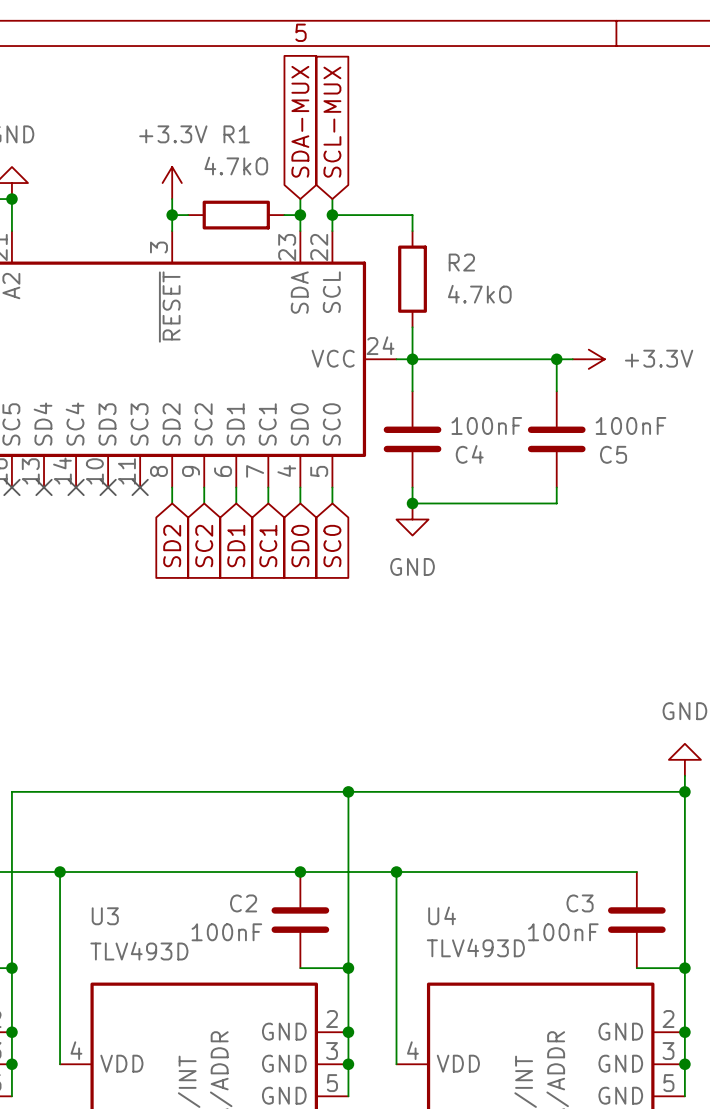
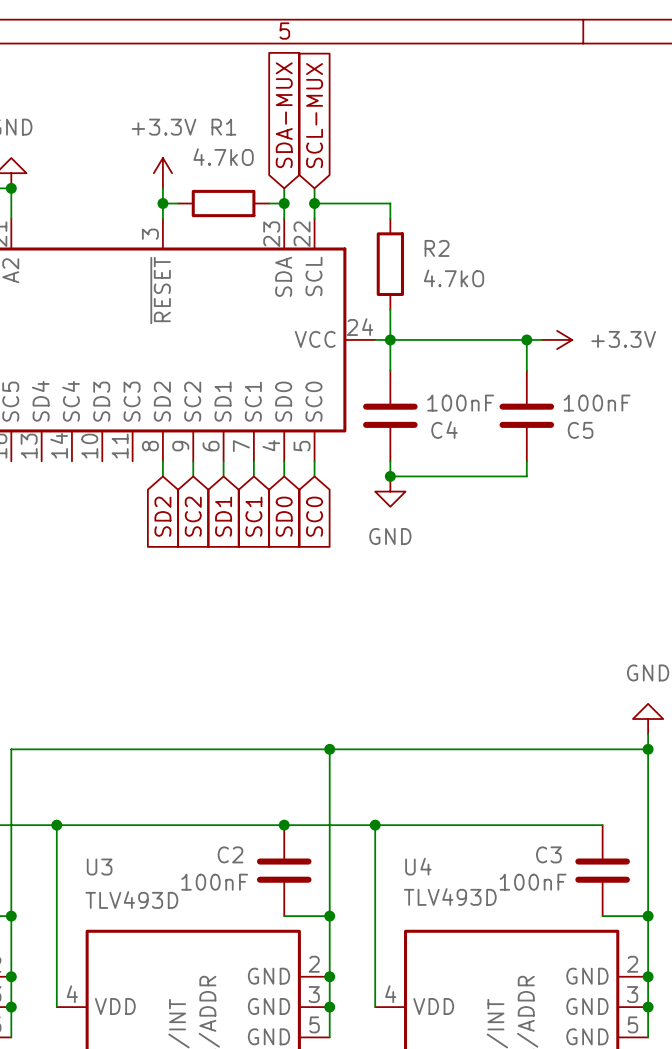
no-connect mark: (11, 487) -> none
no-connect mark: (44, 487) -> none
no-connect mark: (76, 487) -> none
no-connect mark: (108, 487) -> none
no-connect mark: (140, 487) -> none

